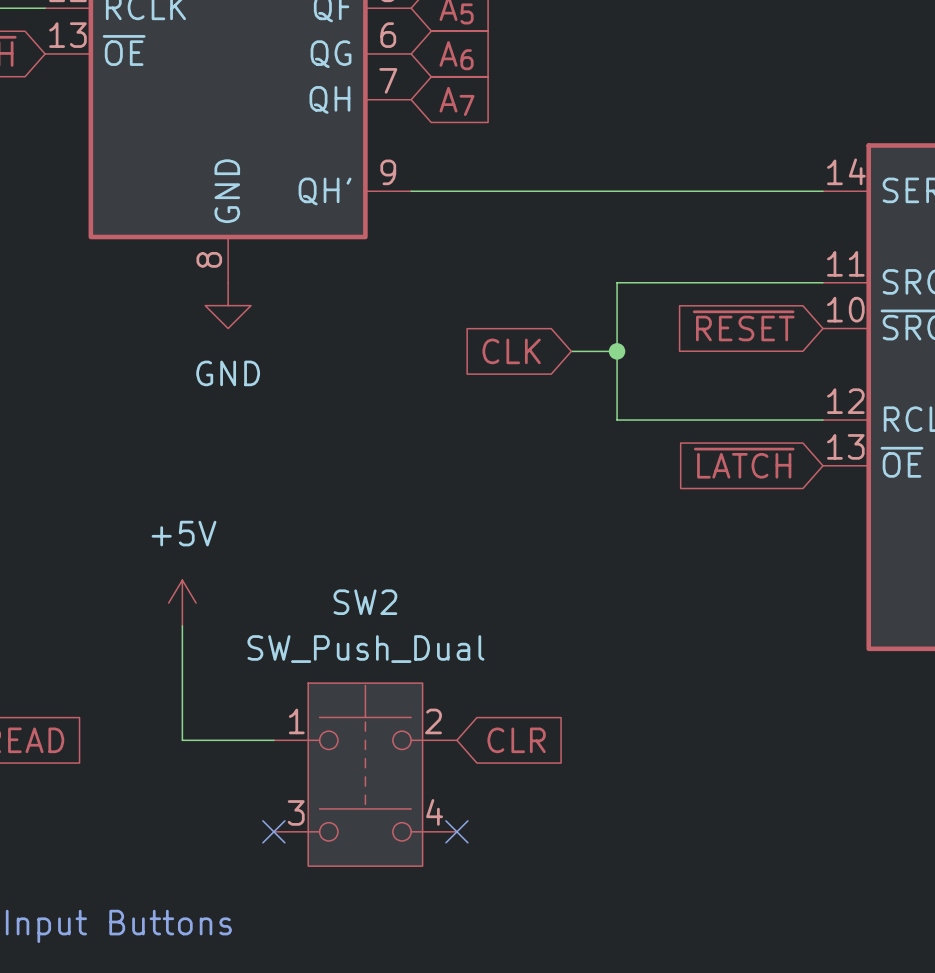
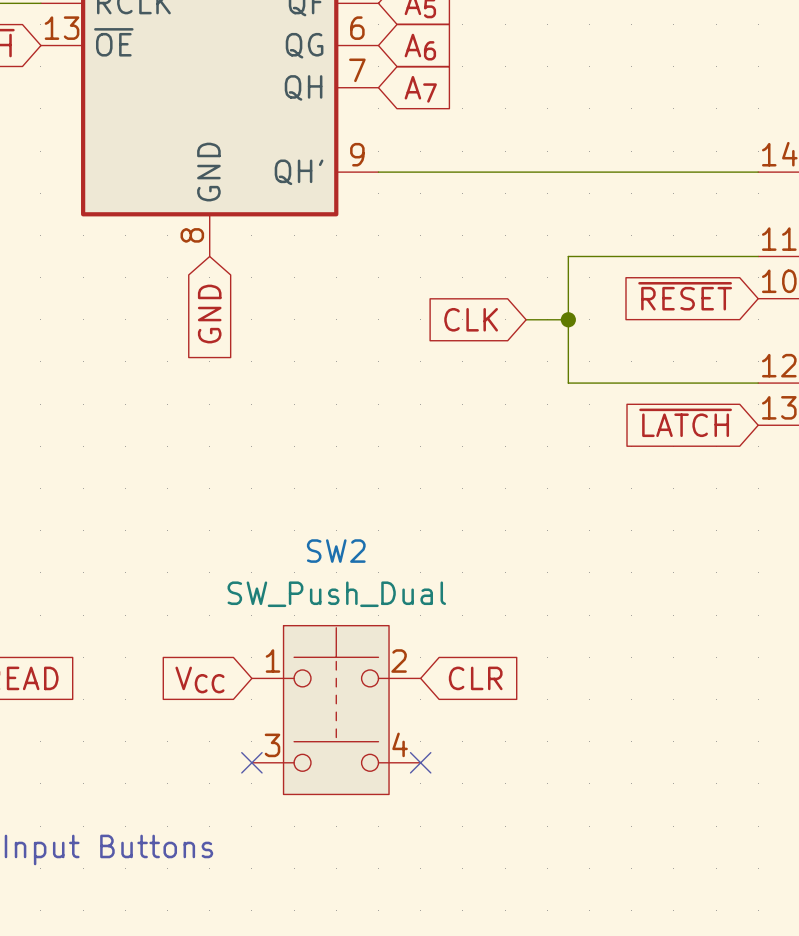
power symbol: GND (228, 305) -> none
global label: none -> GND (209, 314)
power symbol: +5V (182, 603) -> none
wire: (182, 625) (182, 740) (273, 740) -> none
global label: none -> VCC (199, 679)

